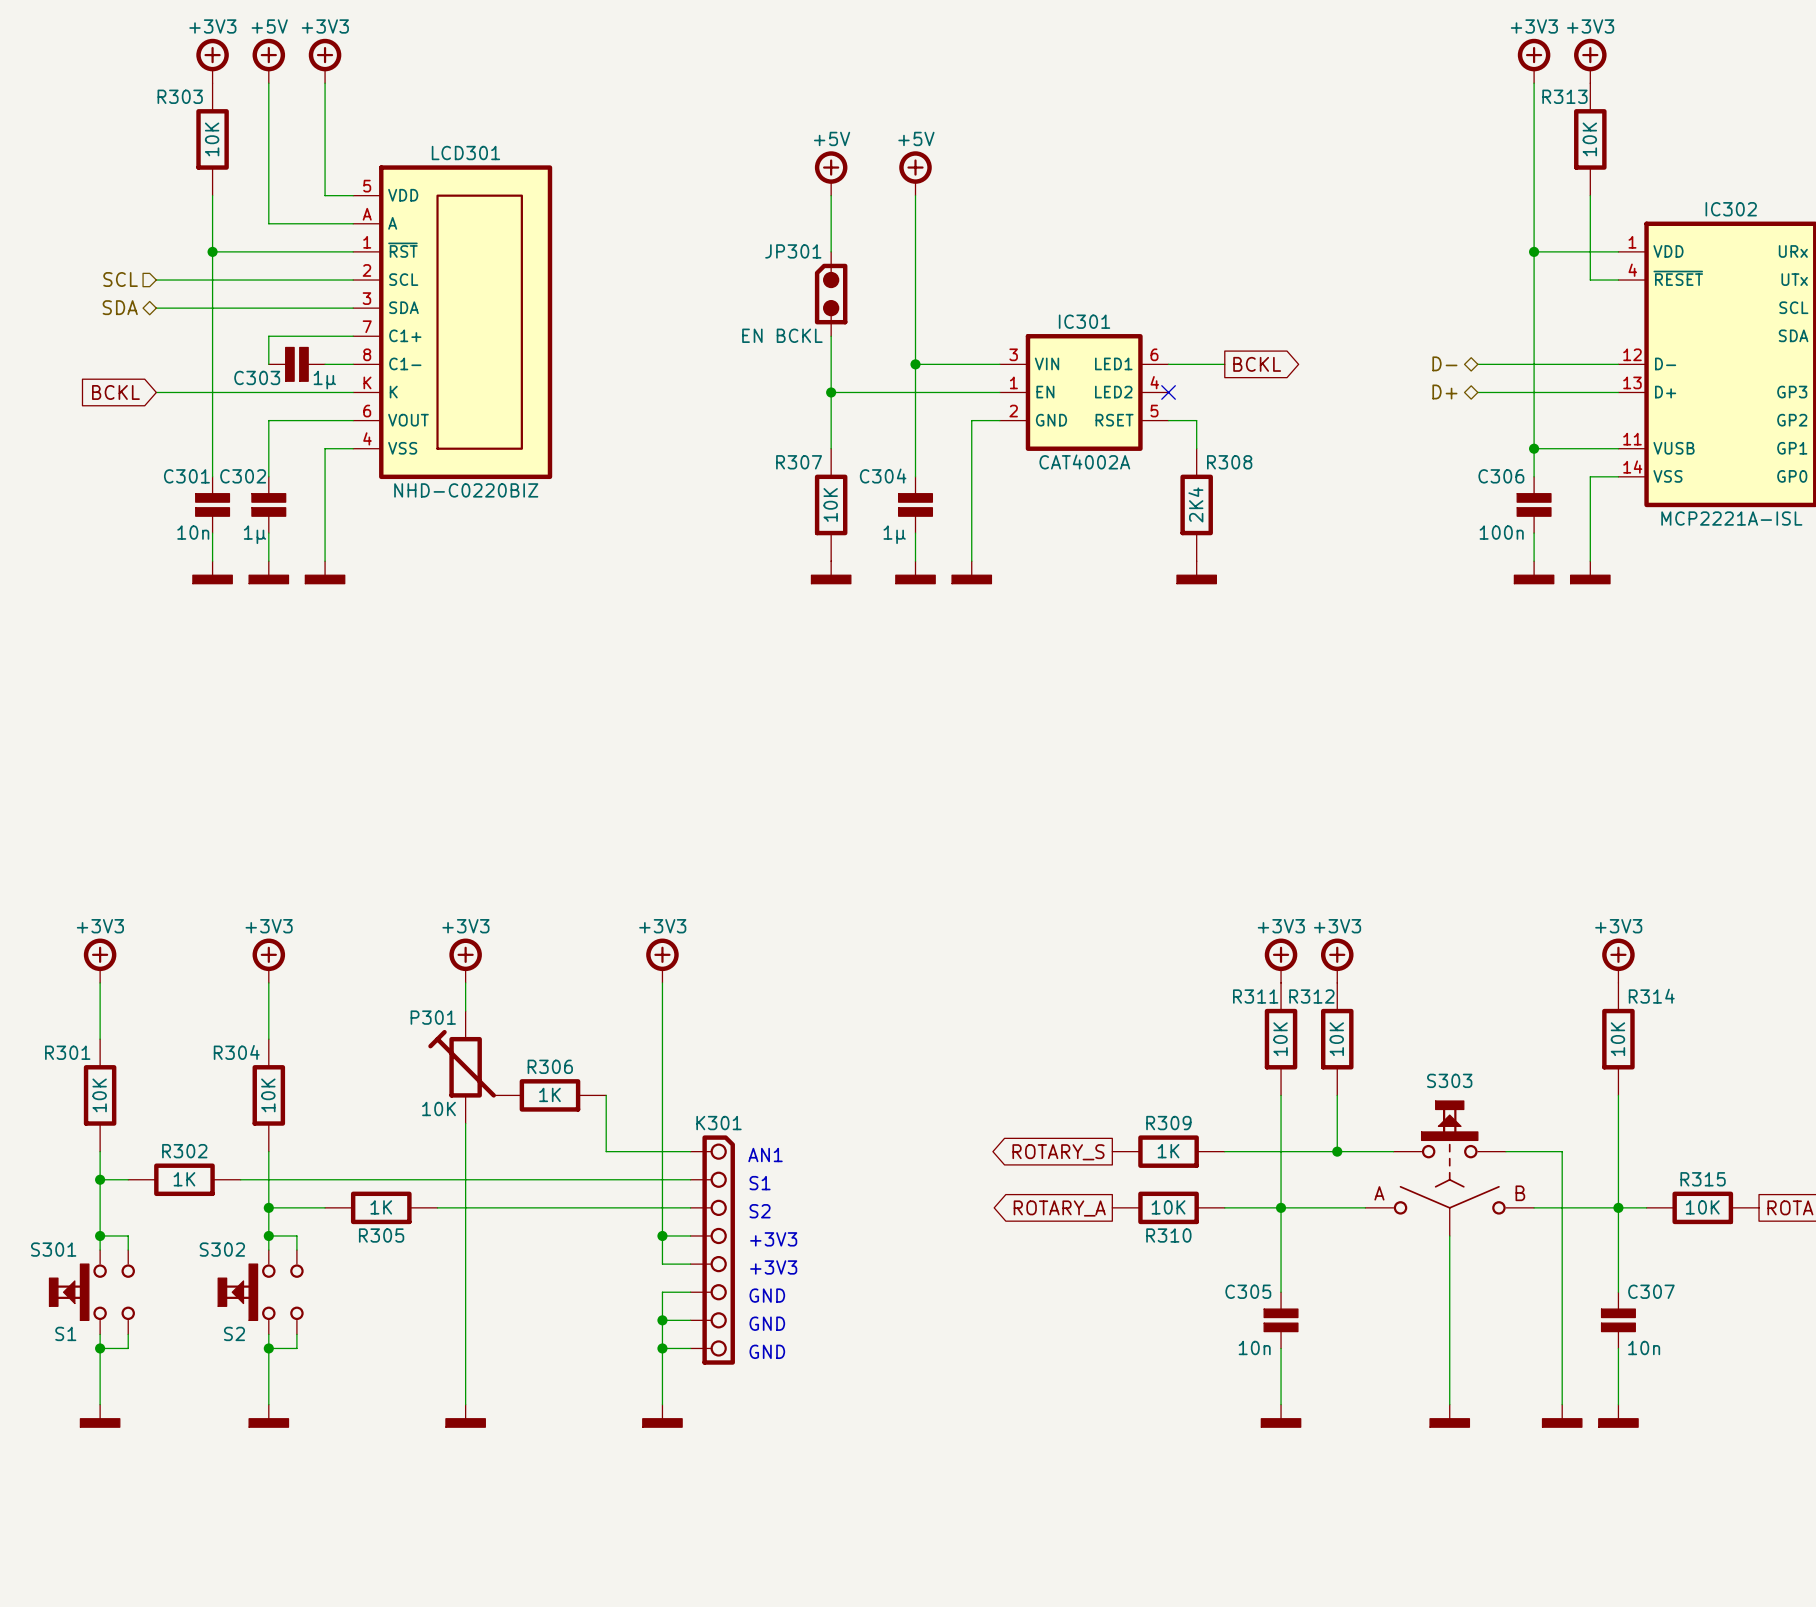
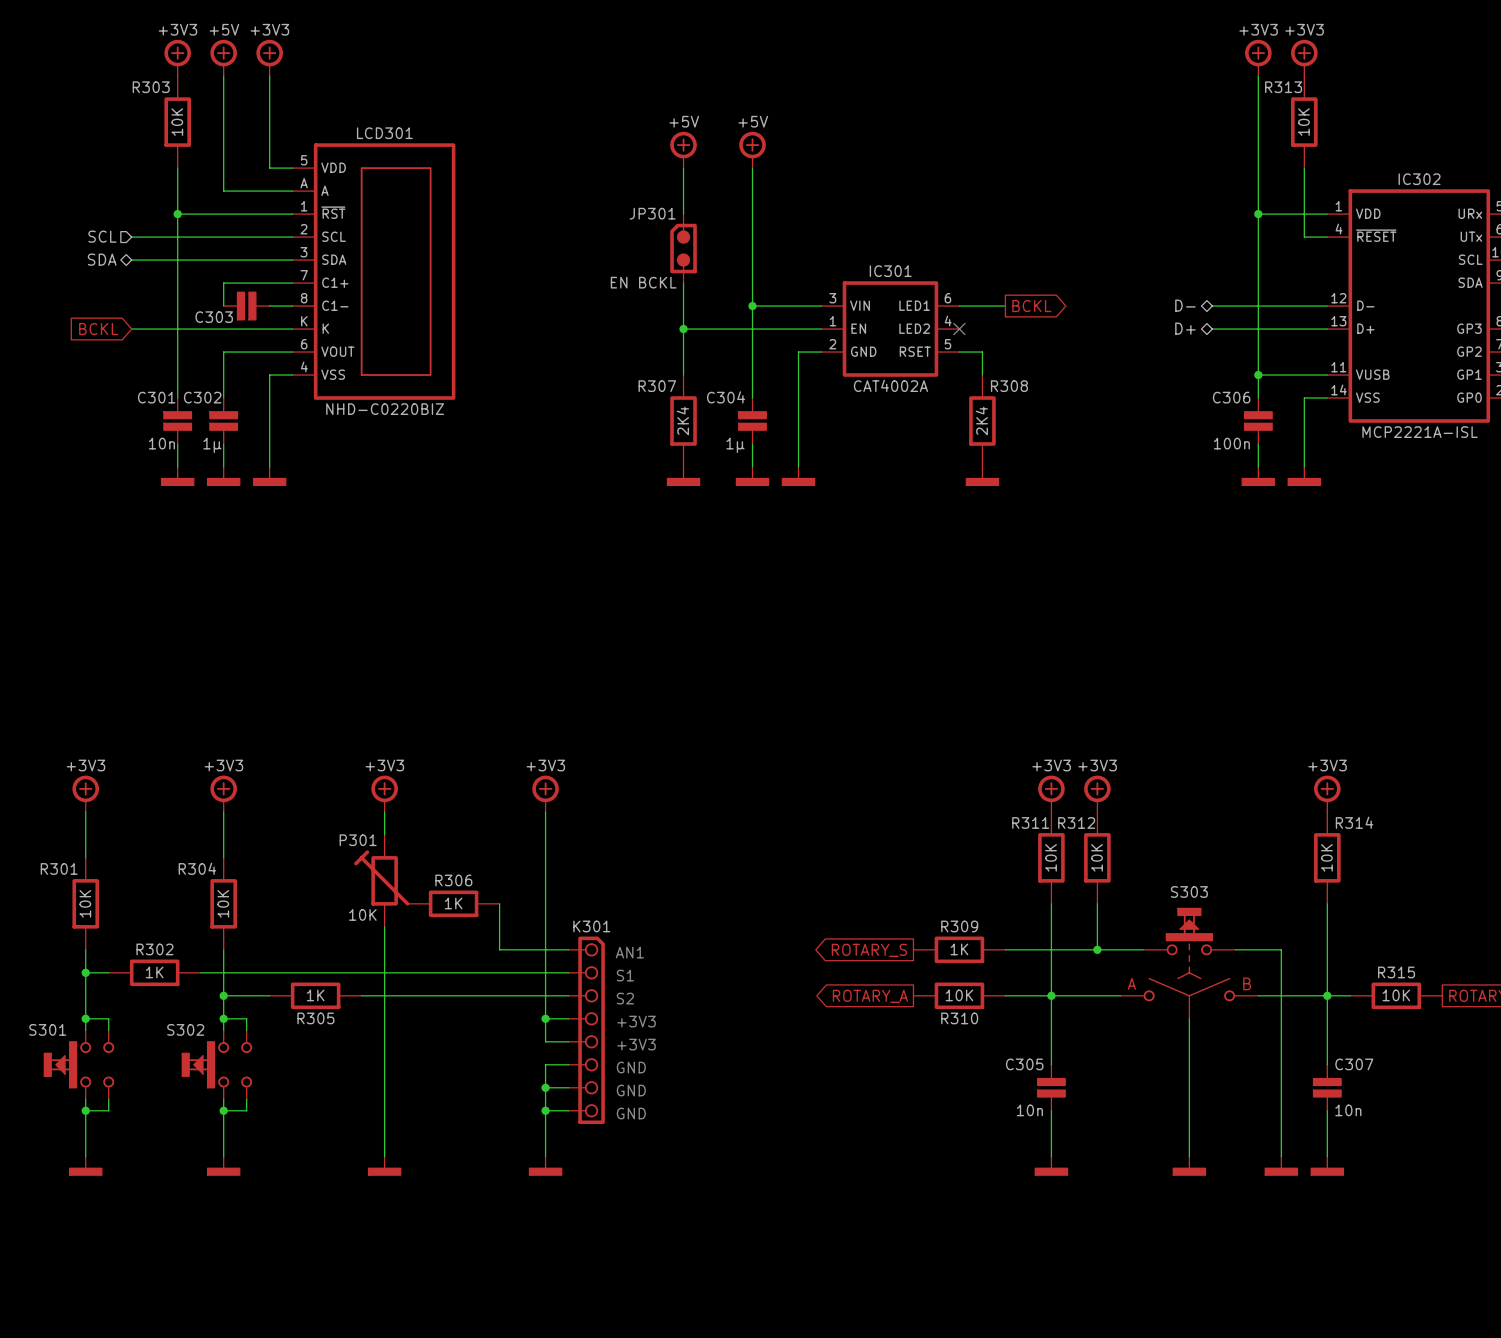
C303 value: 1µ (324, 380) -> none
R307 value: 10K (830, 504) -> 2K4 (682, 421)
S301 value: S1 (65, 1333) -> none
S302 value: S2 (234, 1333) -> none

